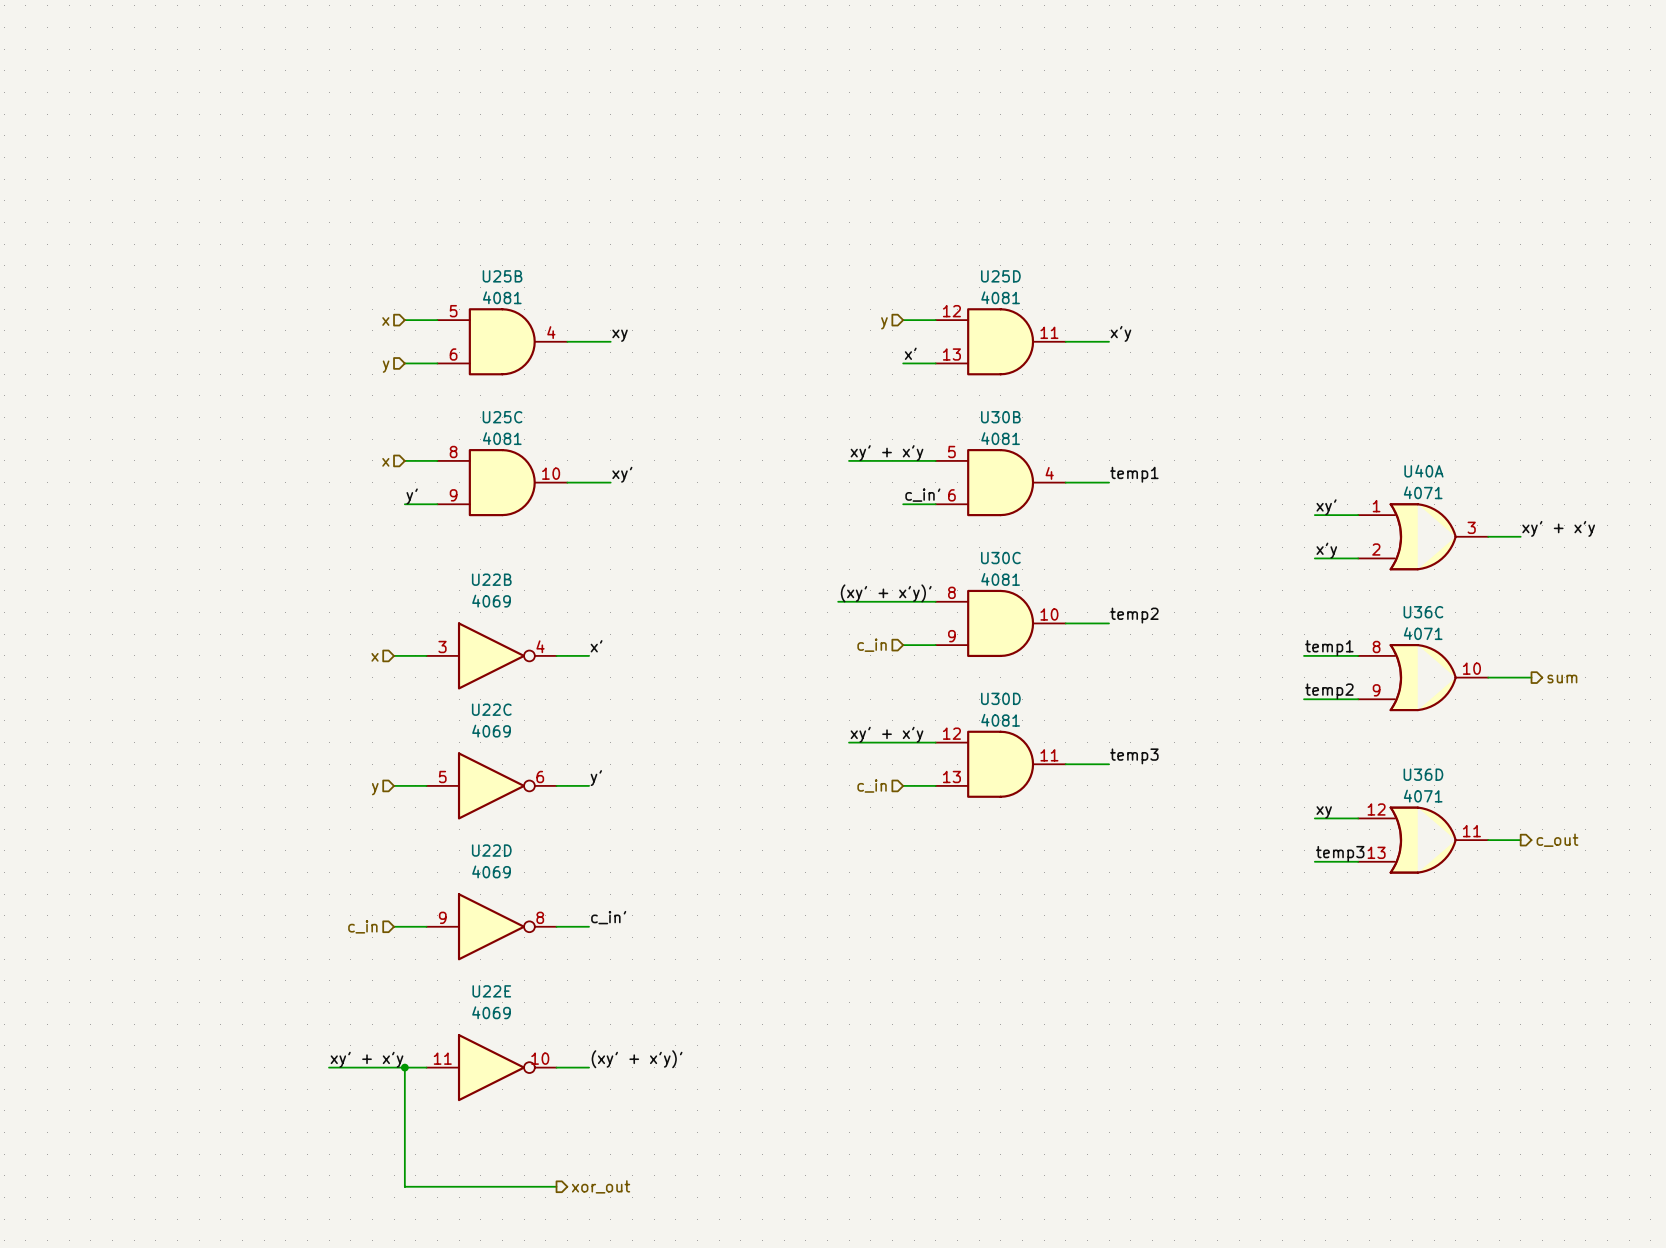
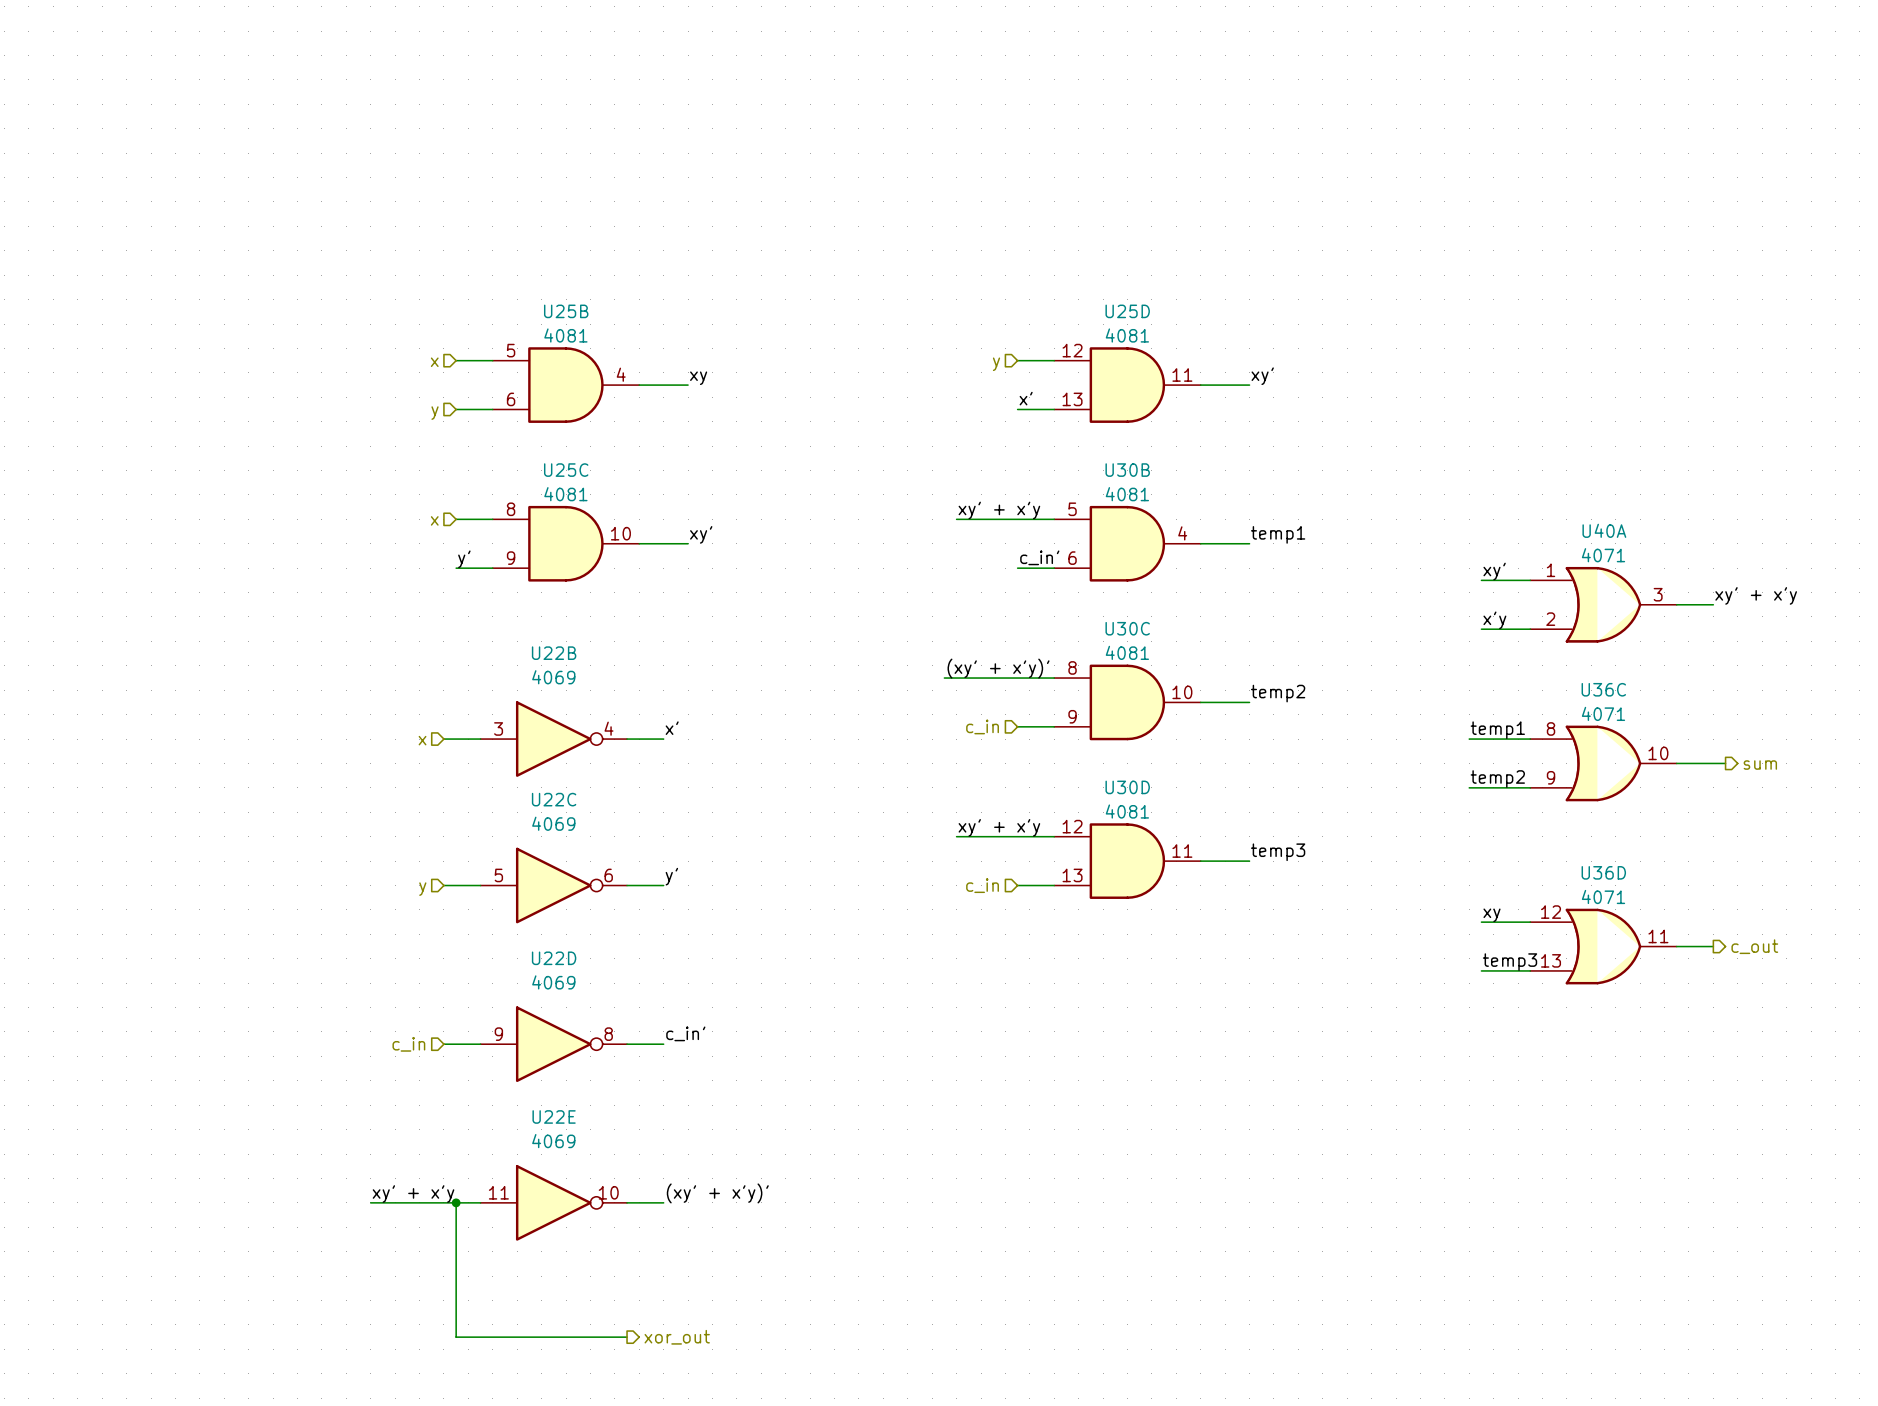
label: x'y (1120, 333) -> xy' (1262, 376)

